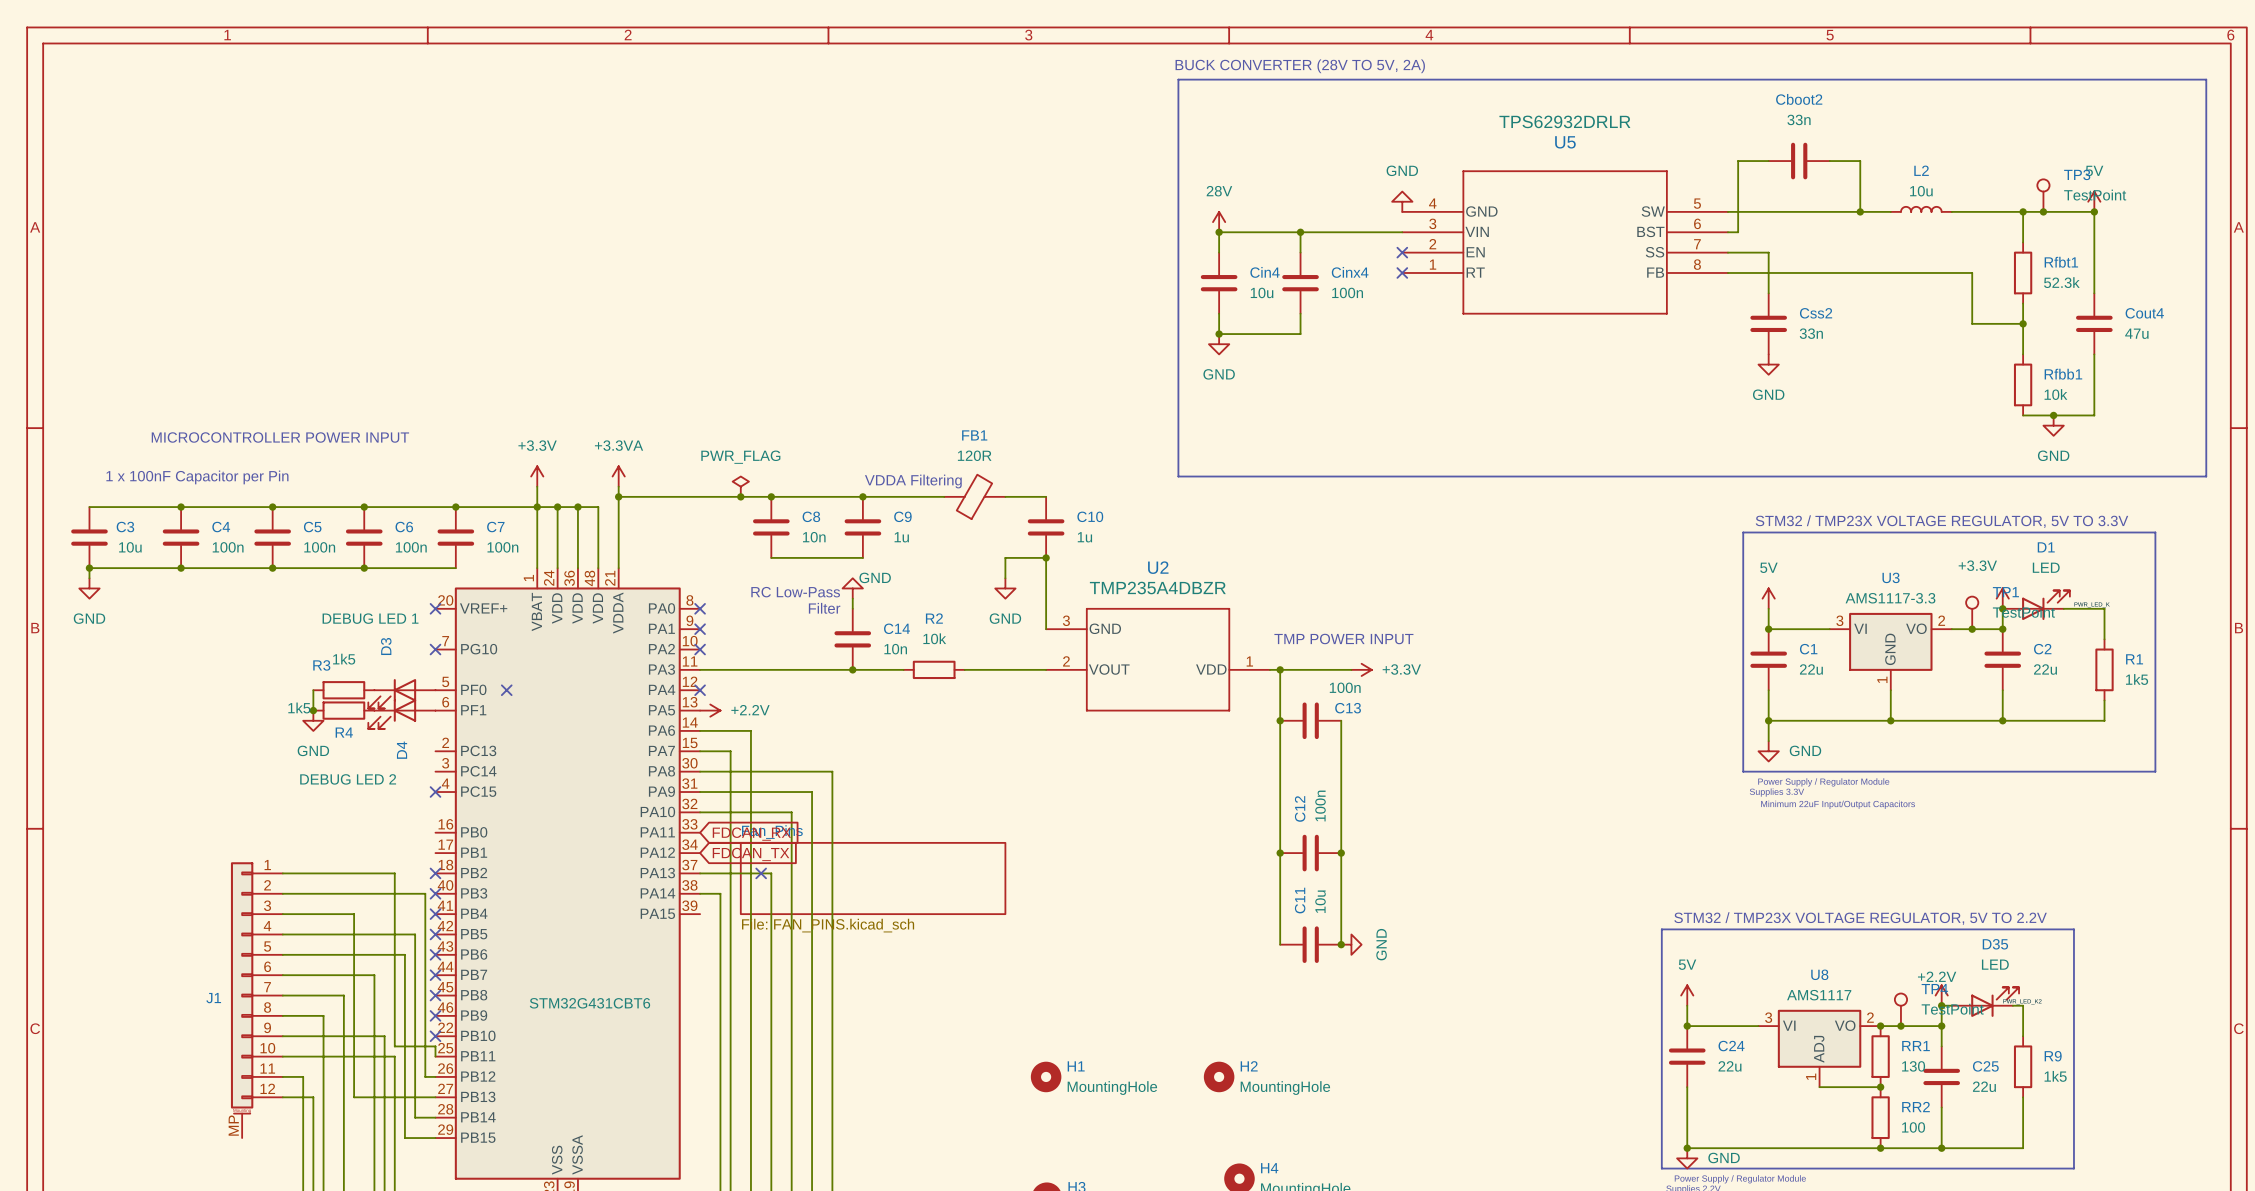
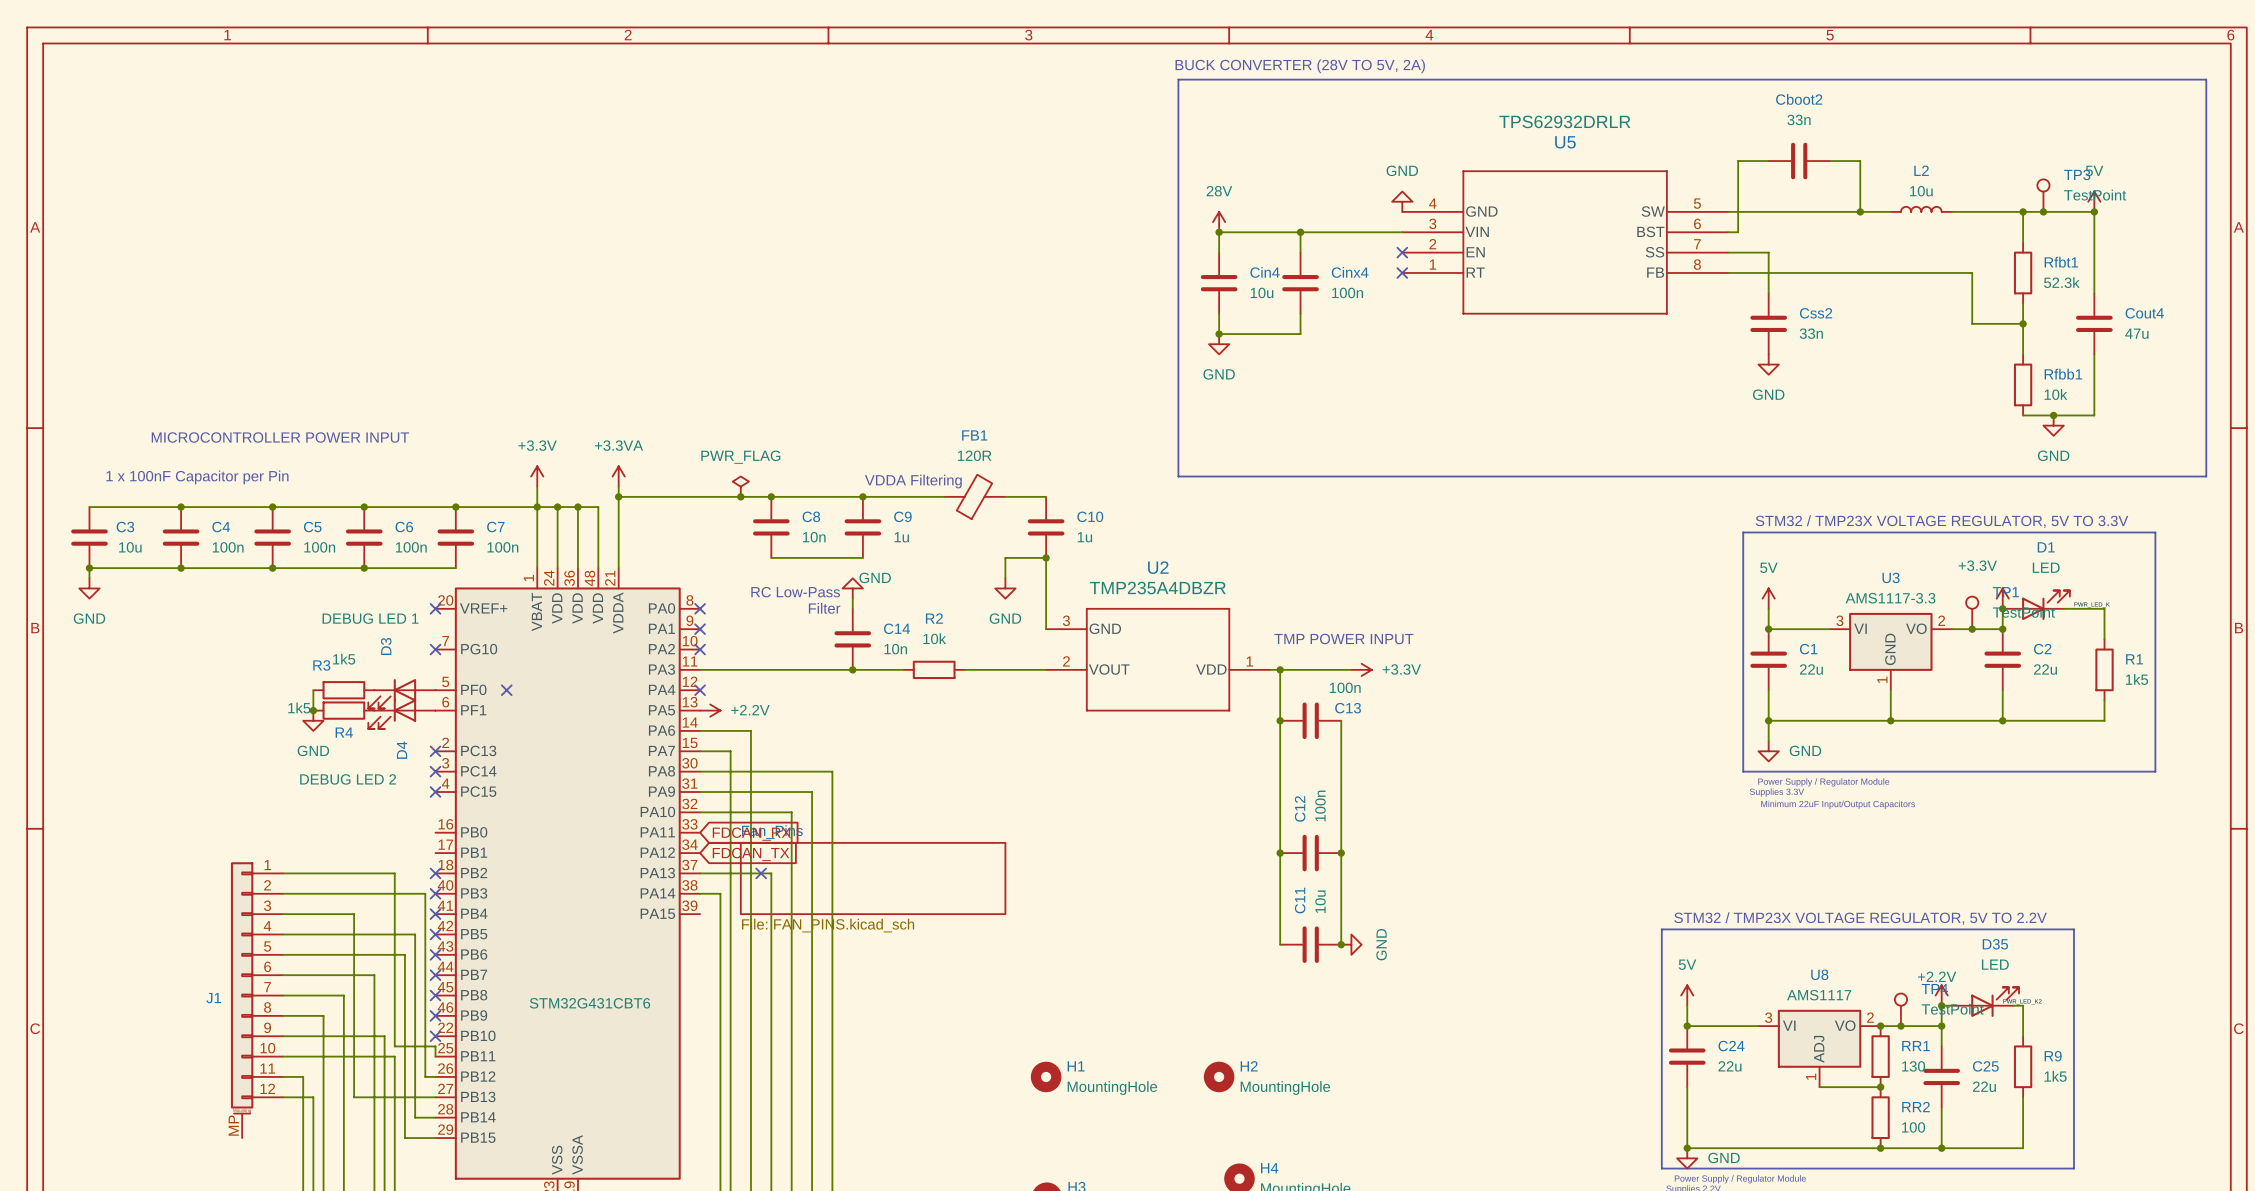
no-connect mark: none -> (435, 751)
no-connect mark: none -> (435, 771)

